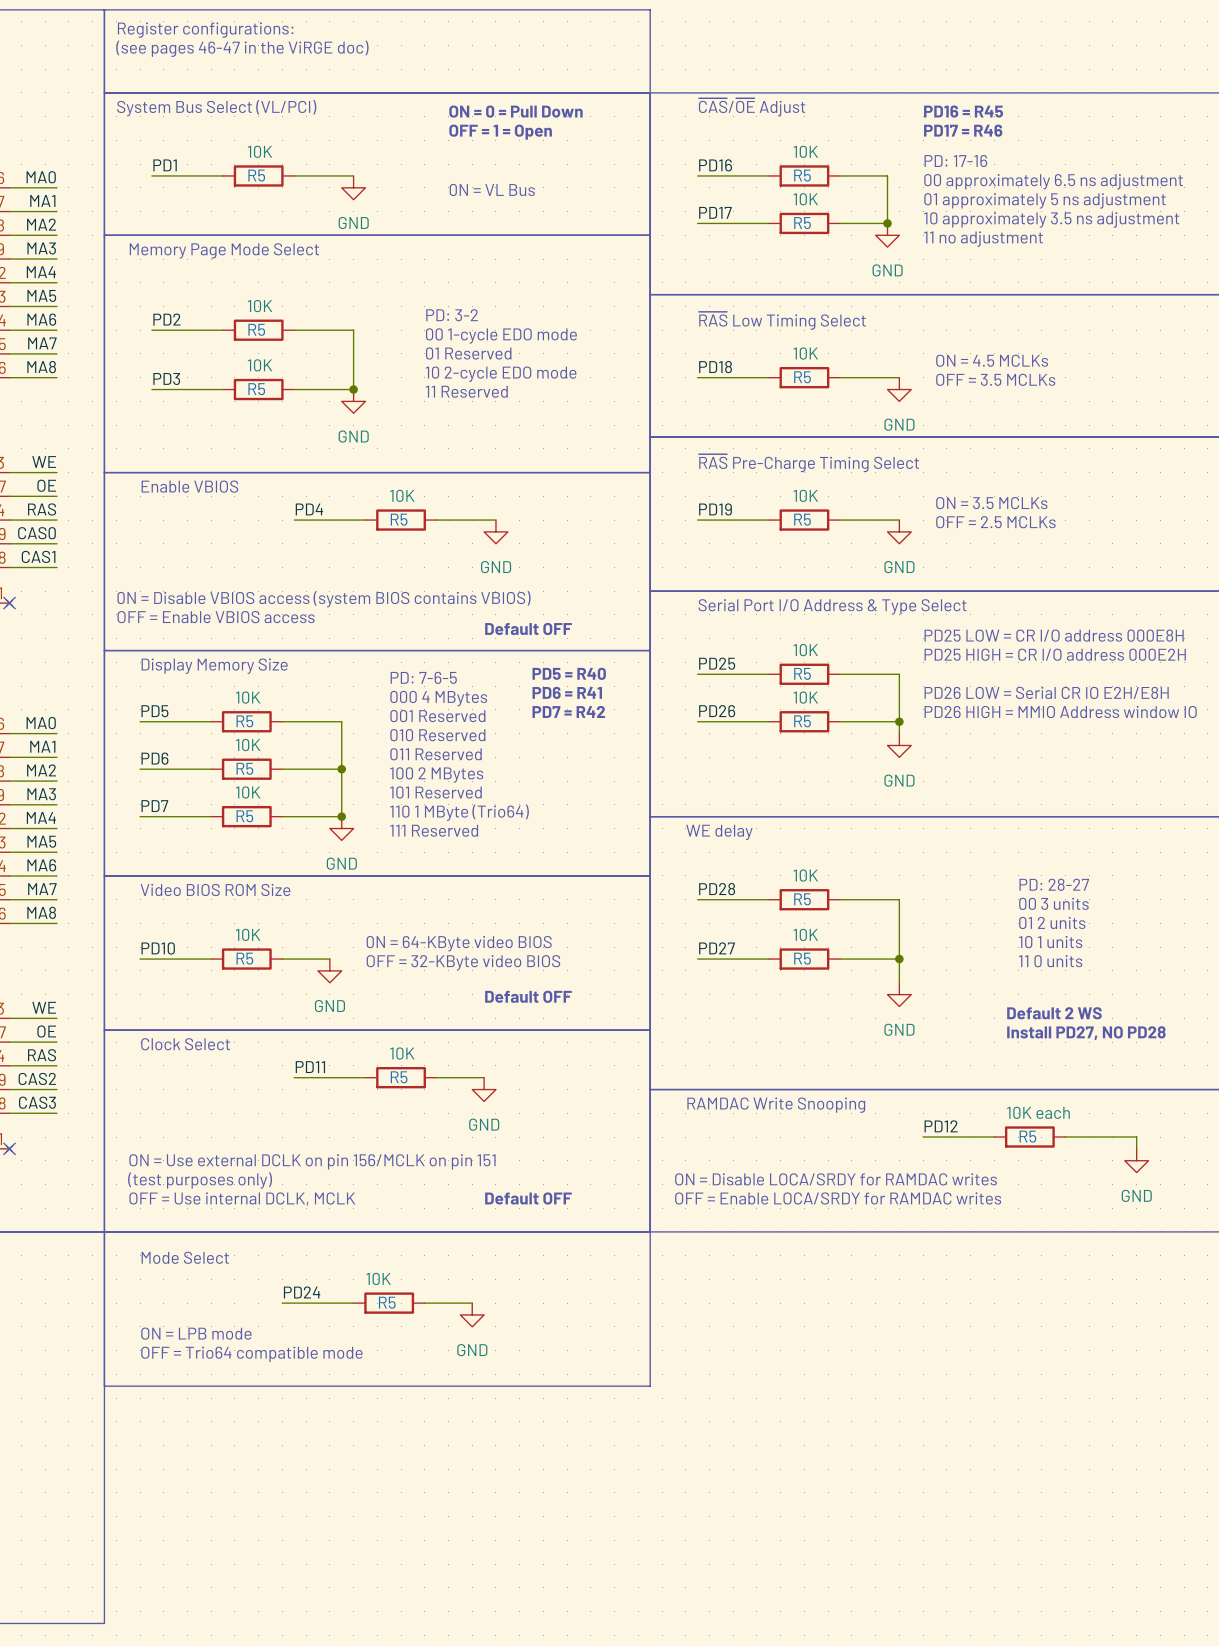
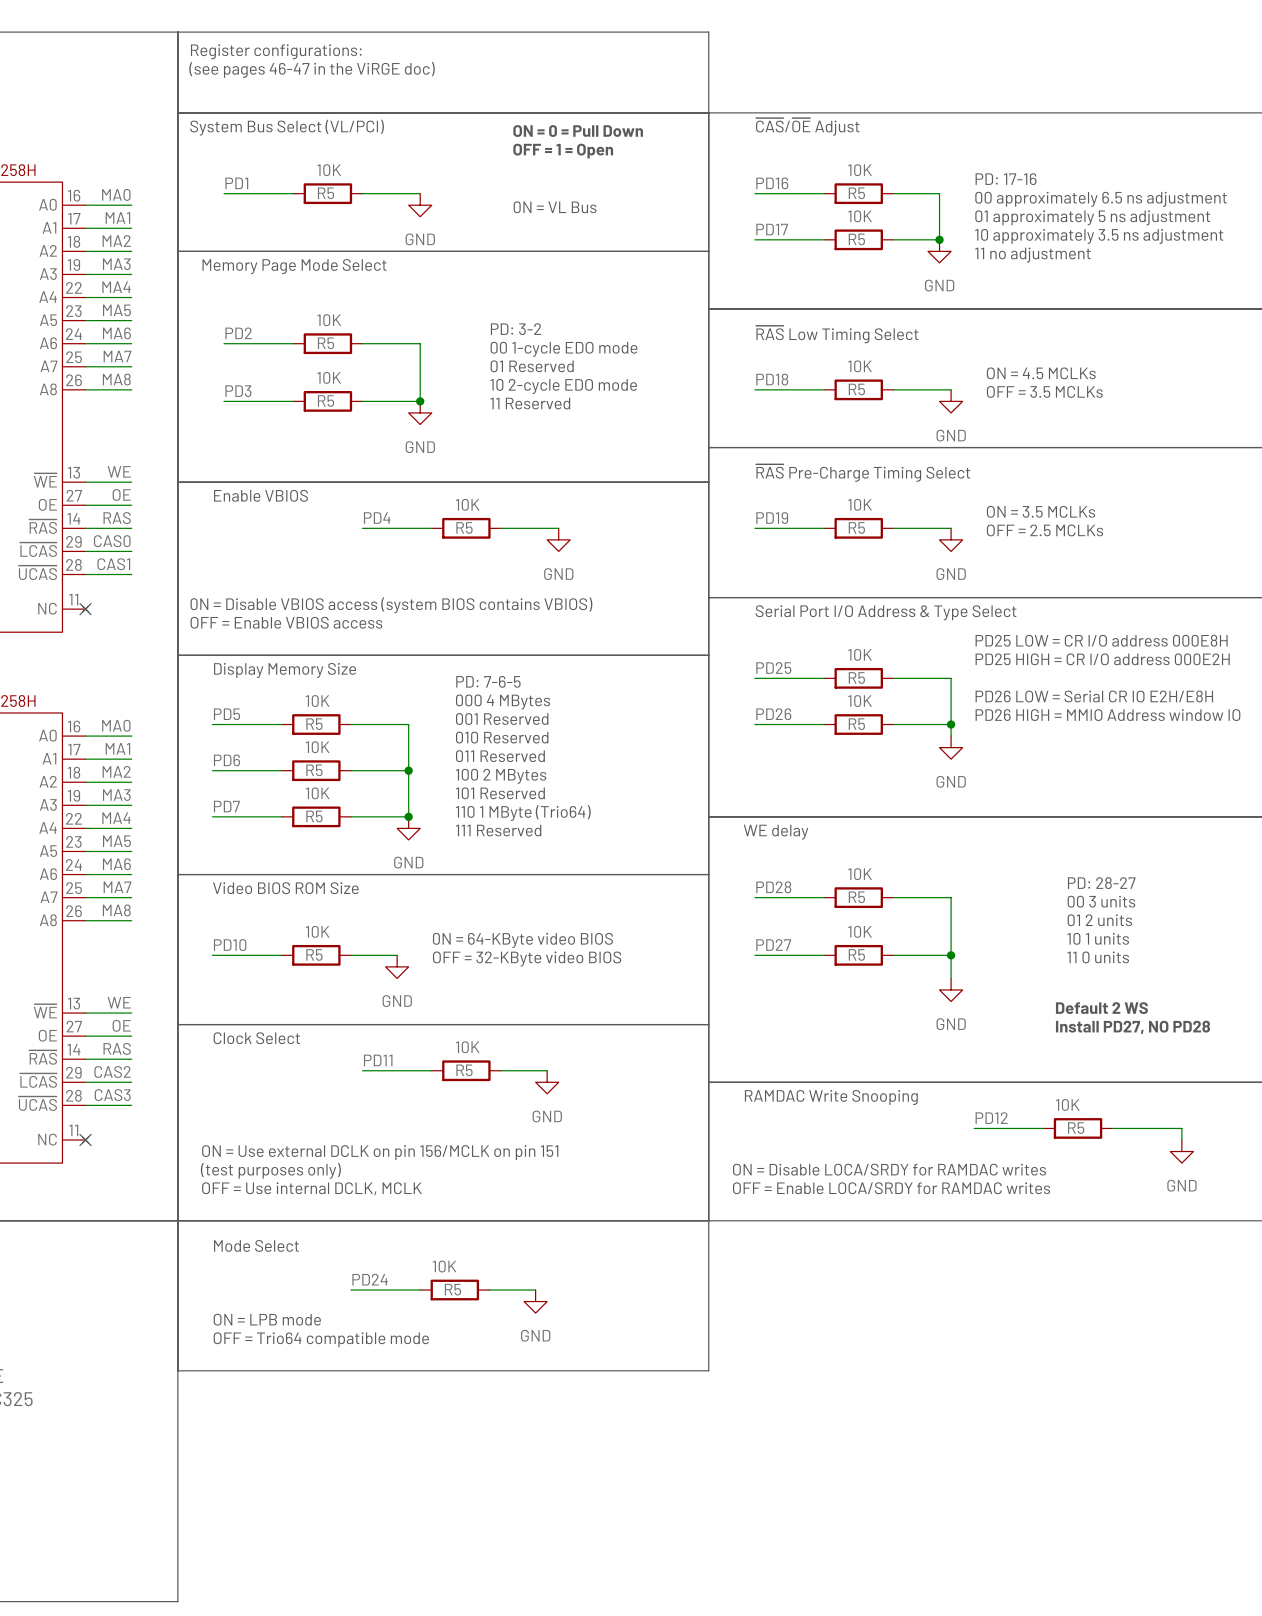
text: PD16 = R45 (963, 111) -> none
text: PD17 = R46 (963, 130) -> none
text: Default OFF (528, 629) -> none
text: PD5 = R40 (569, 673) -> none
text: PD6 = R41 (567, 692) -> none
text: PD7 = R42 (568, 711) -> none
text: Default OFF (528, 996) -> none
R5 value: 10K each (1038, 1112) -> 10K (1067, 1104)
text: Default OFF (528, 1198) -> none

